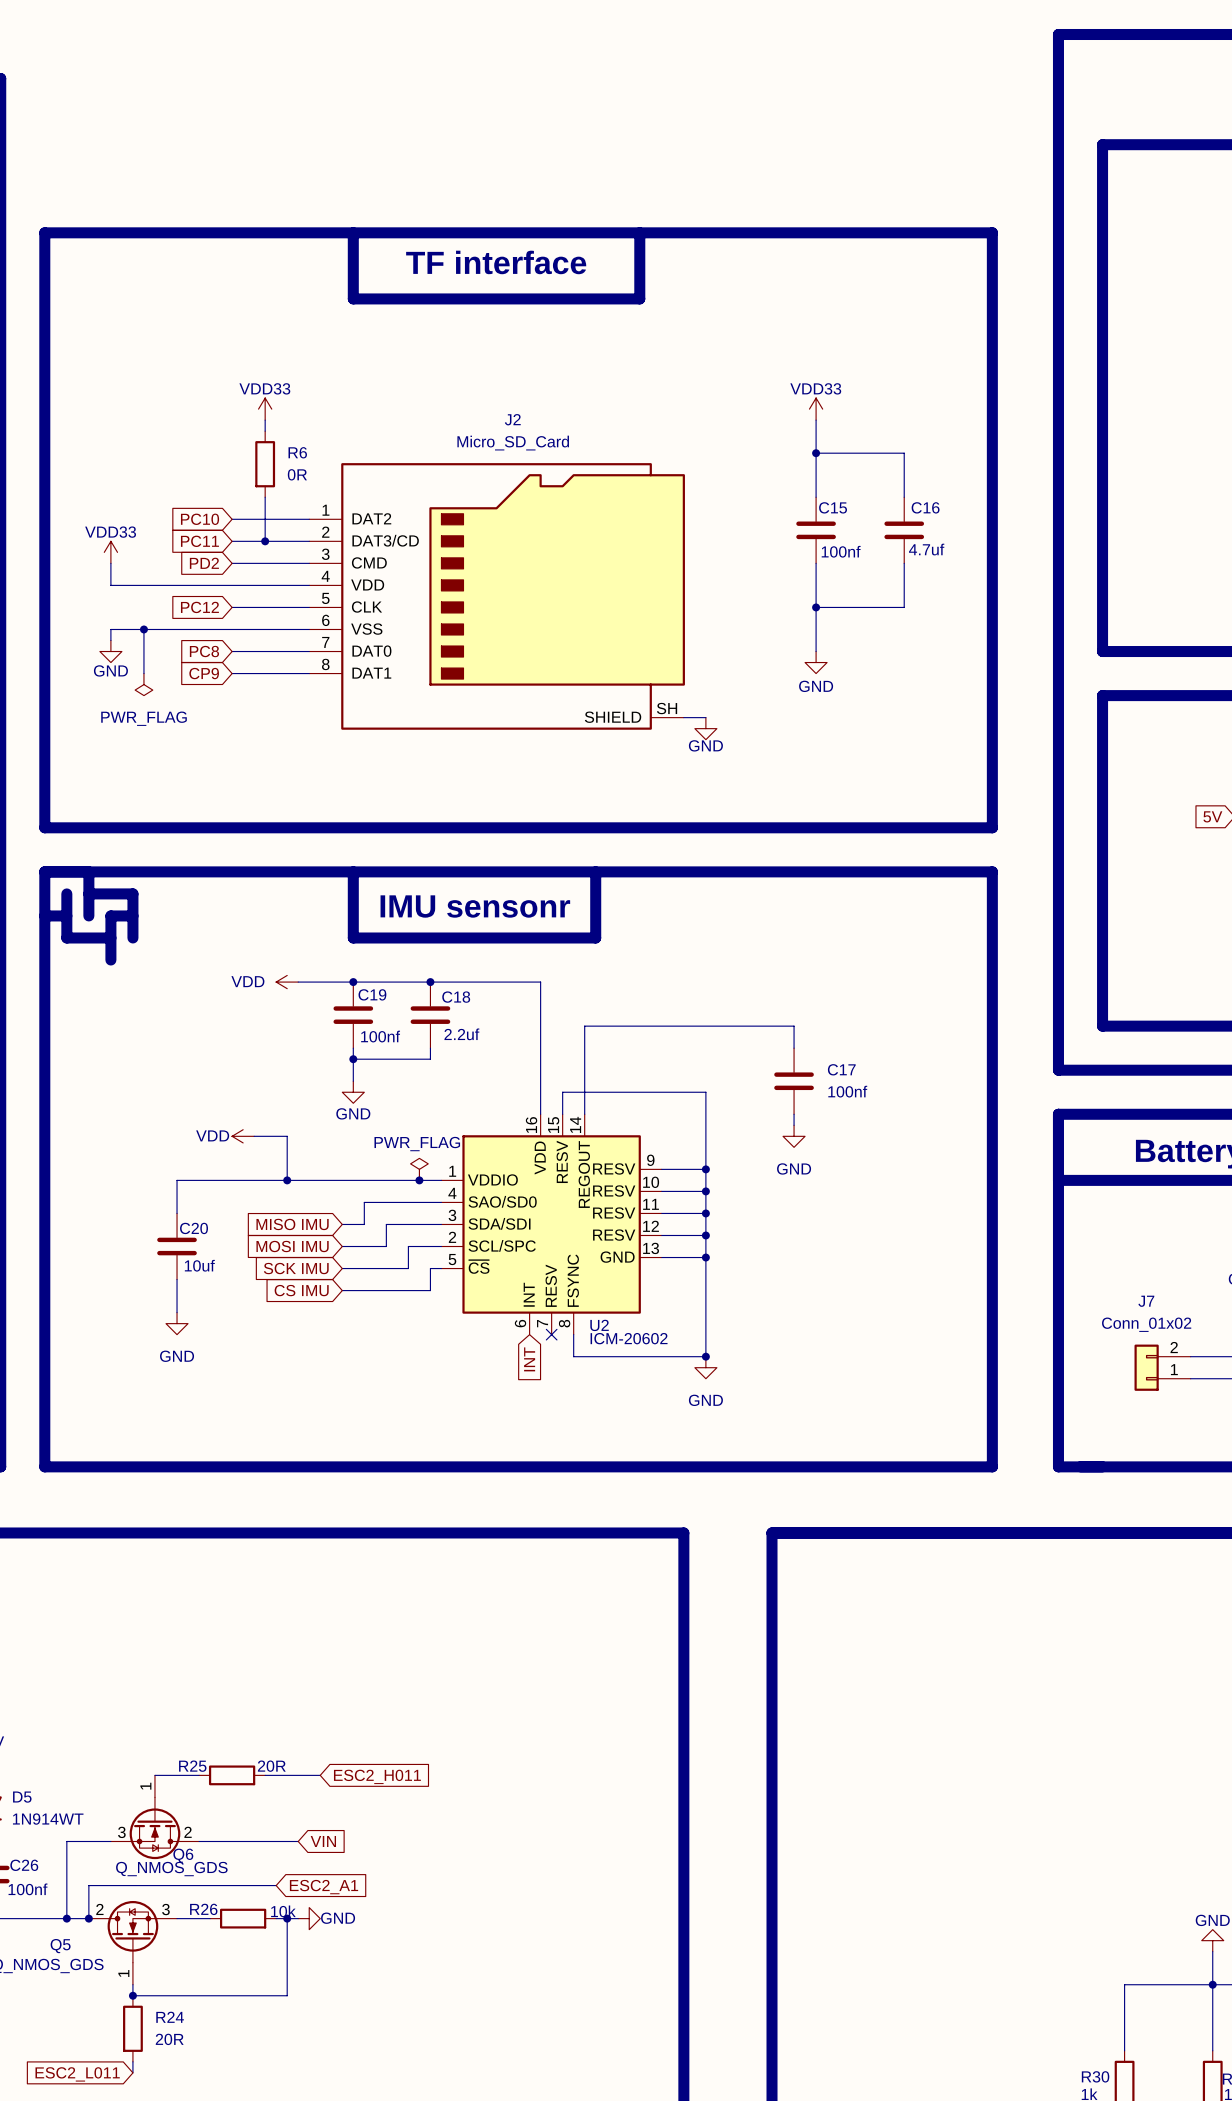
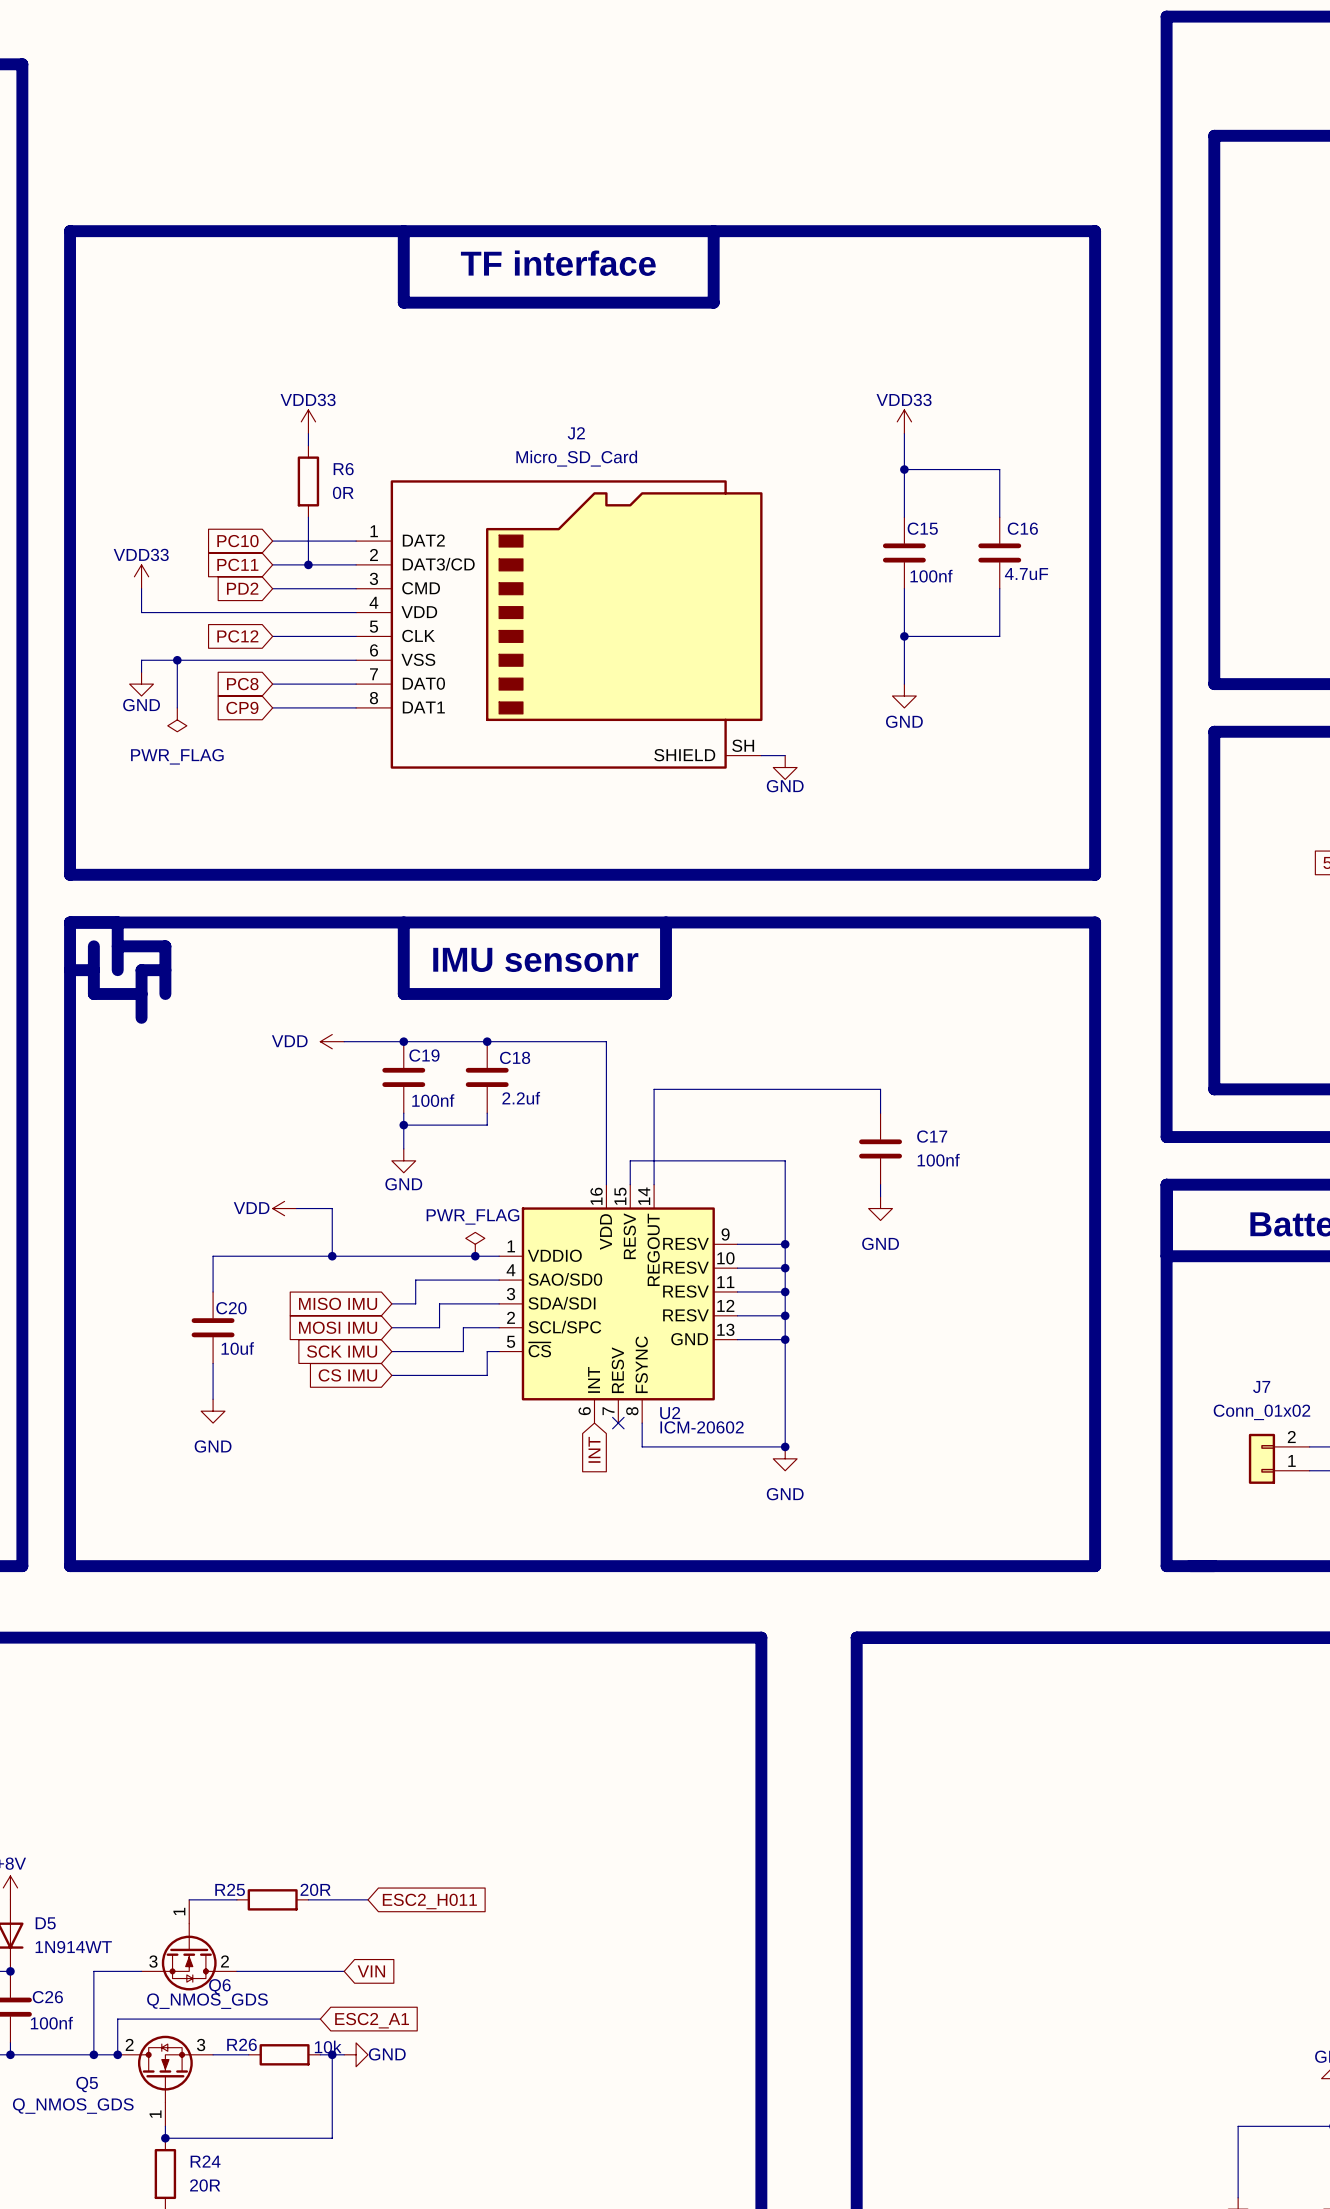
C16 value: 4.7uf (926, 549) -> 4.7uF (1026, 574)

